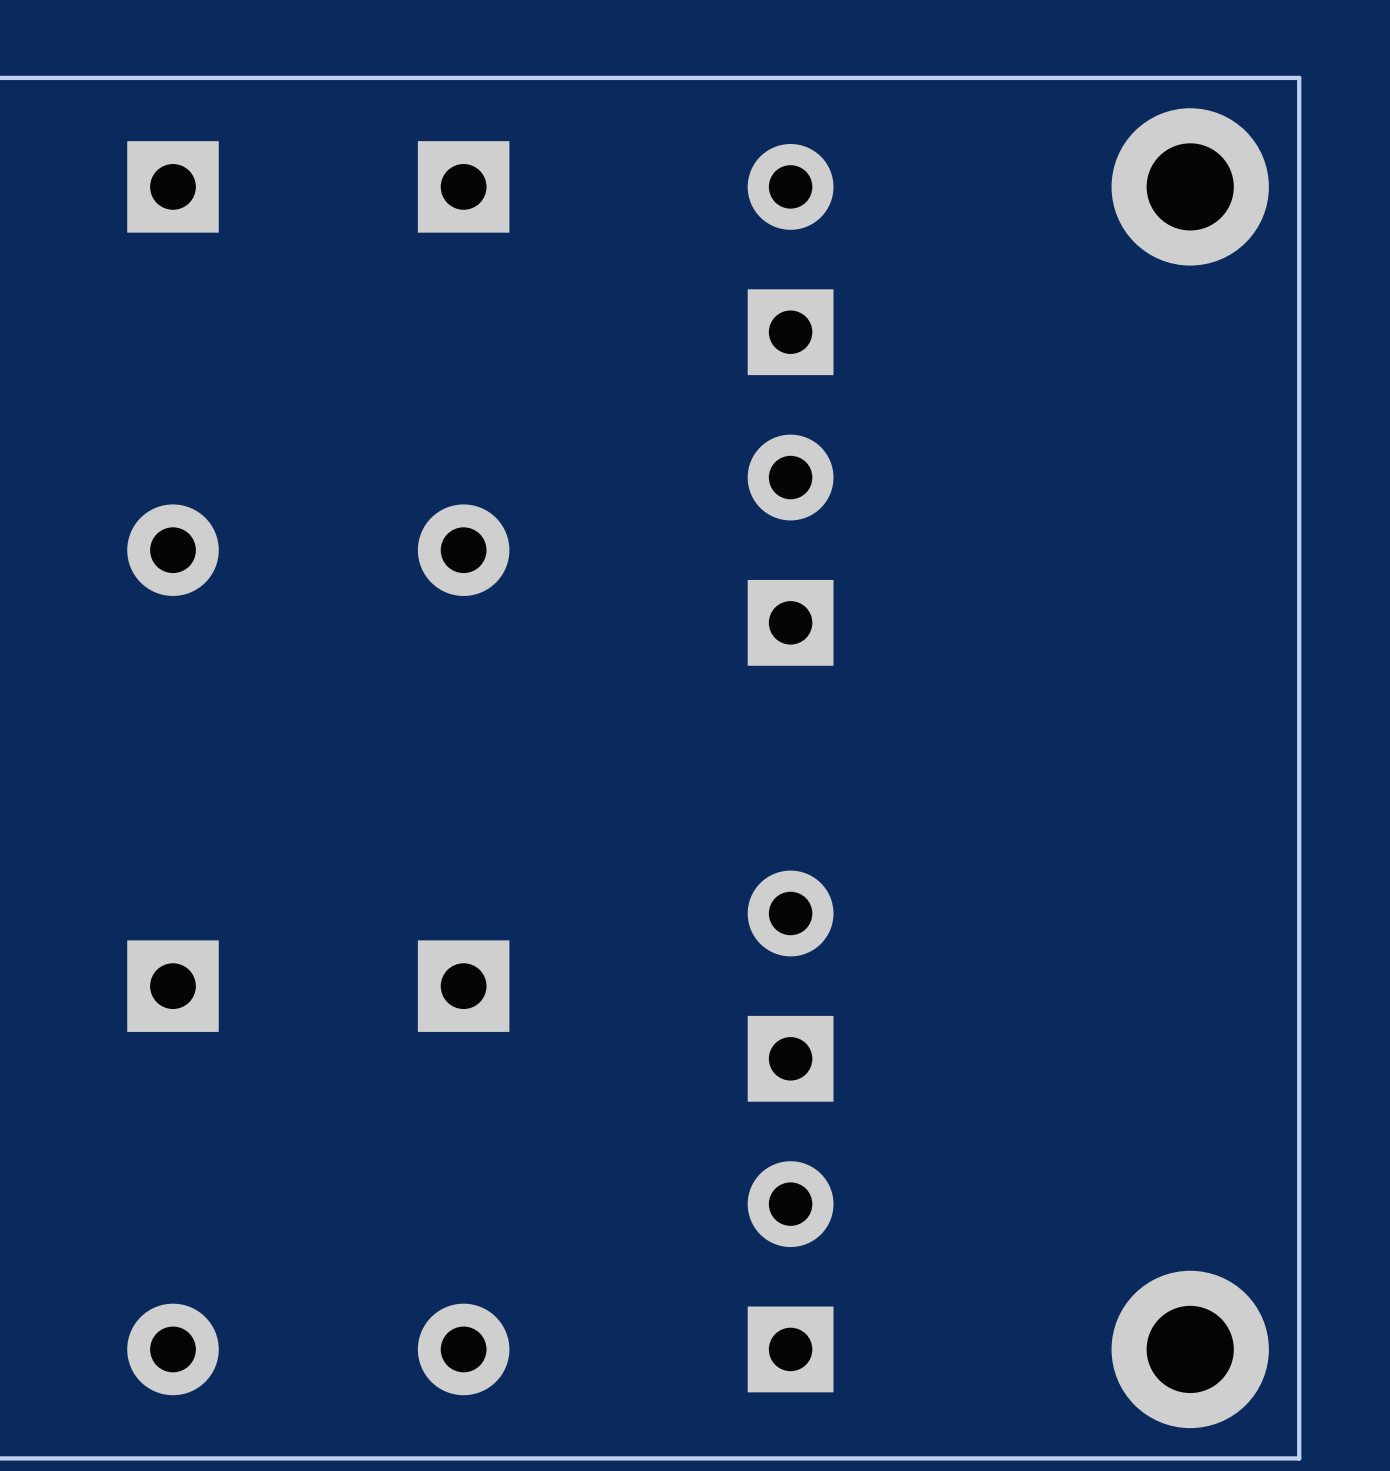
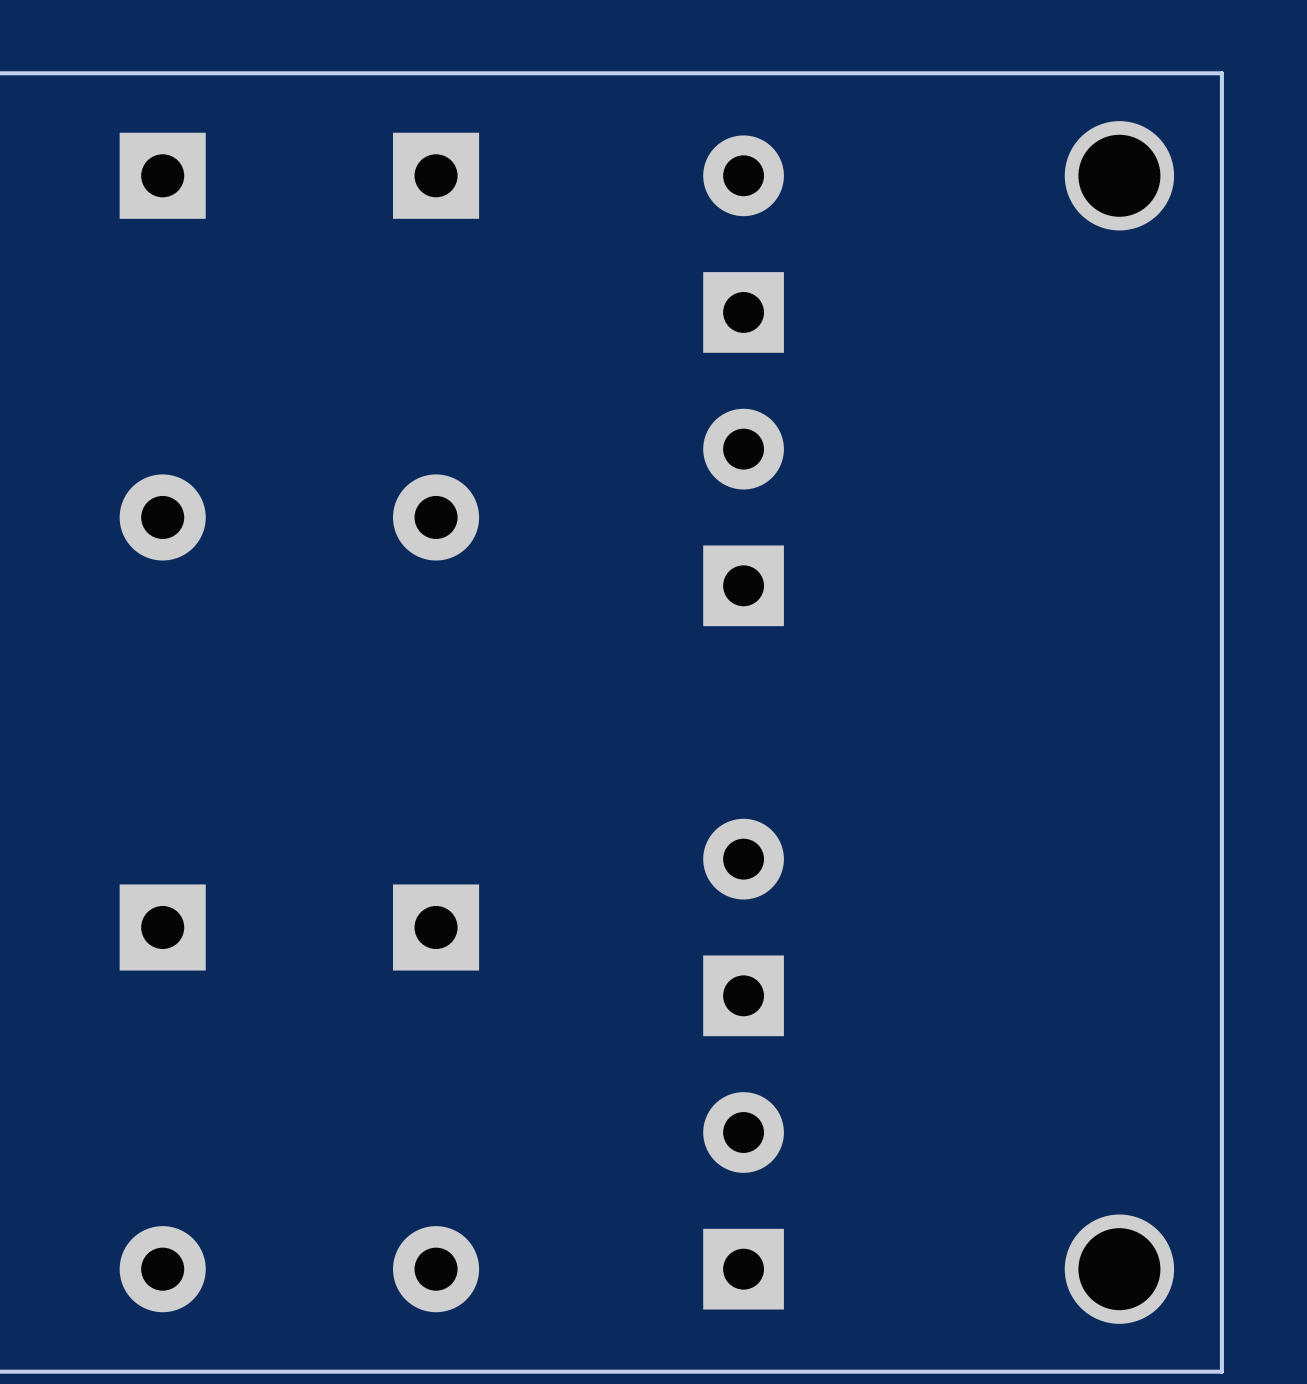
part footprint: [1111, 108, 1269, 266] -> [1064, 121, 1175, 231]
part footprint: [1111, 1270, 1269, 1429] -> [1064, 1214, 1175, 1324]

